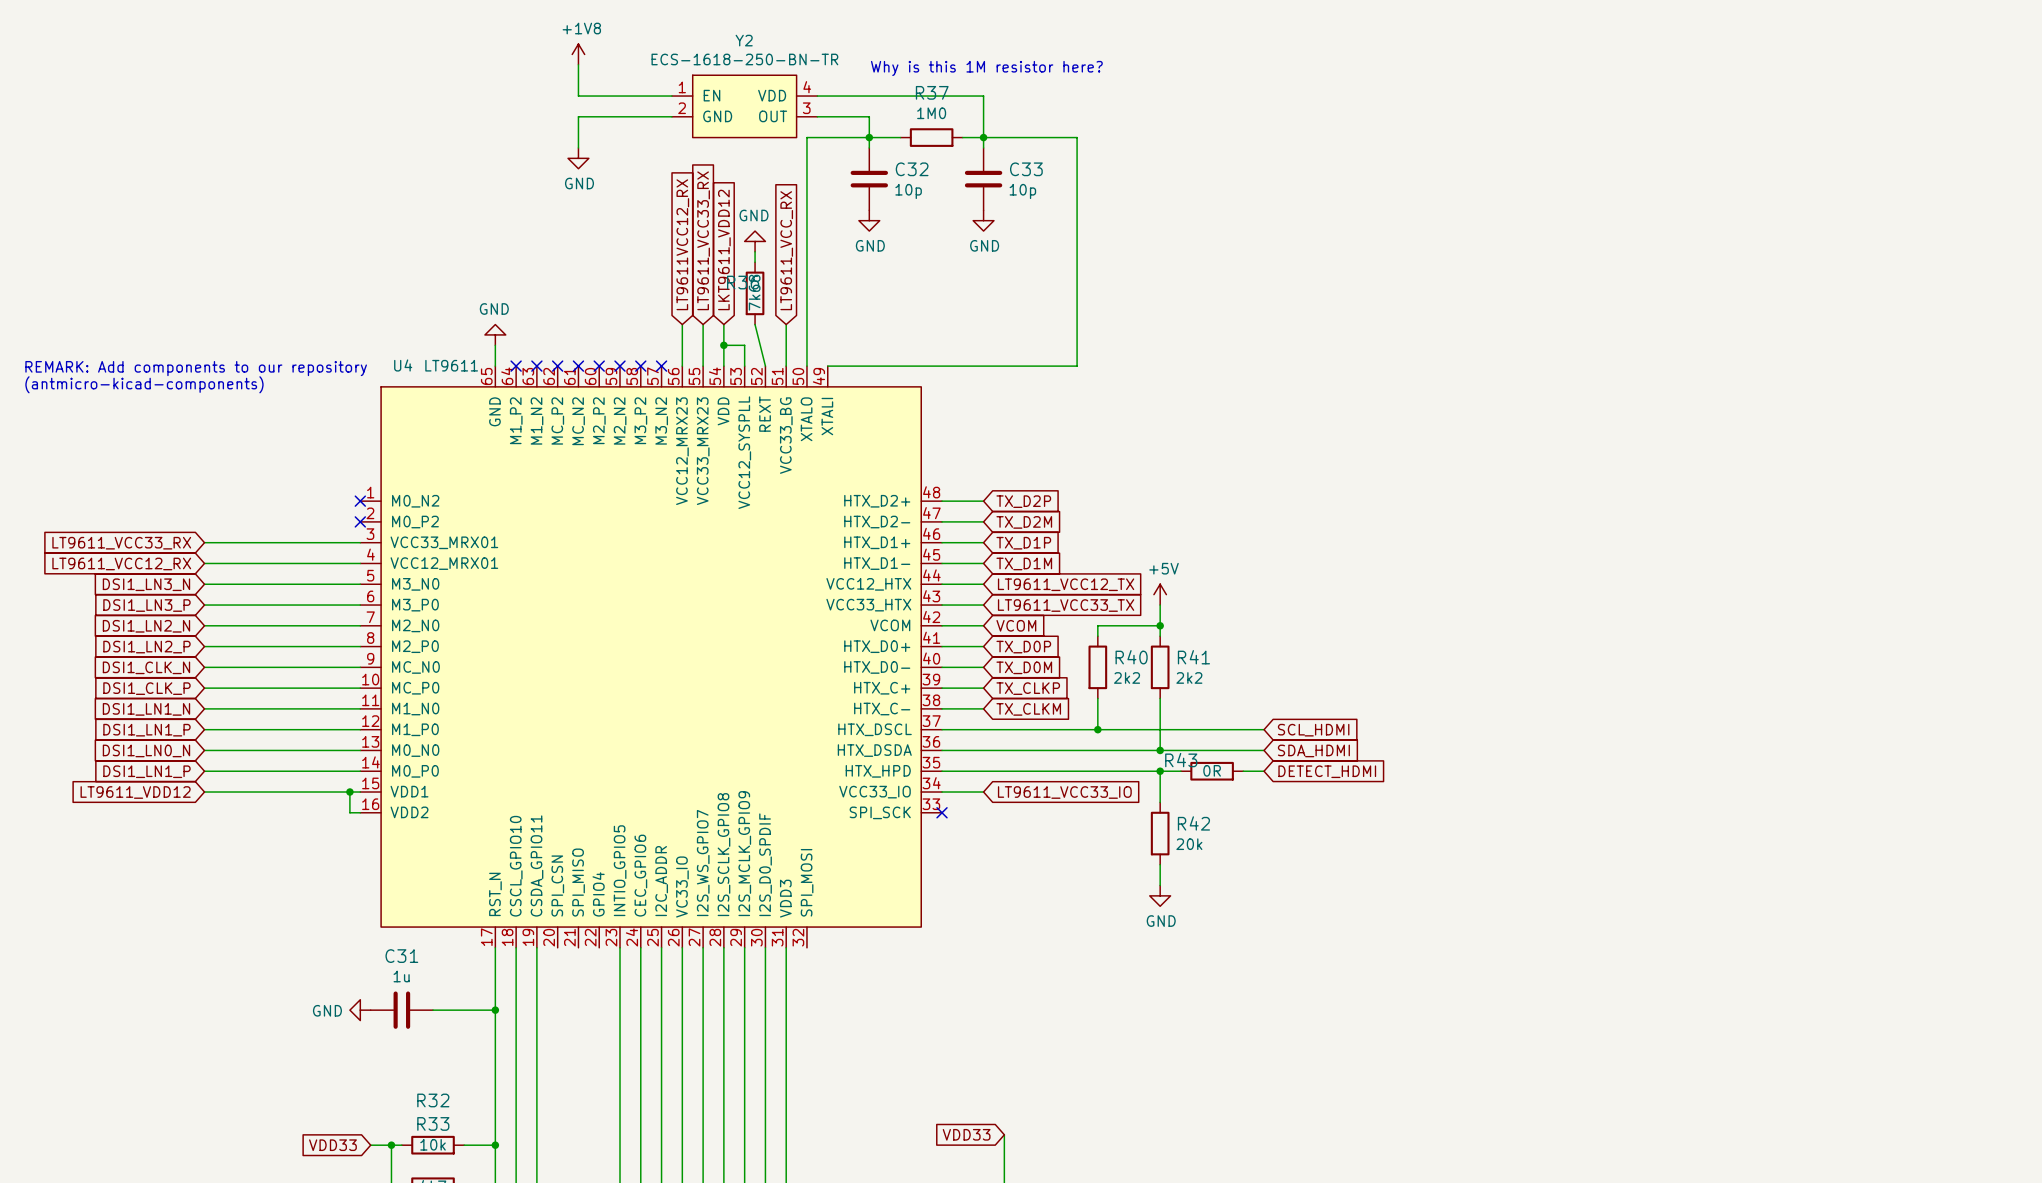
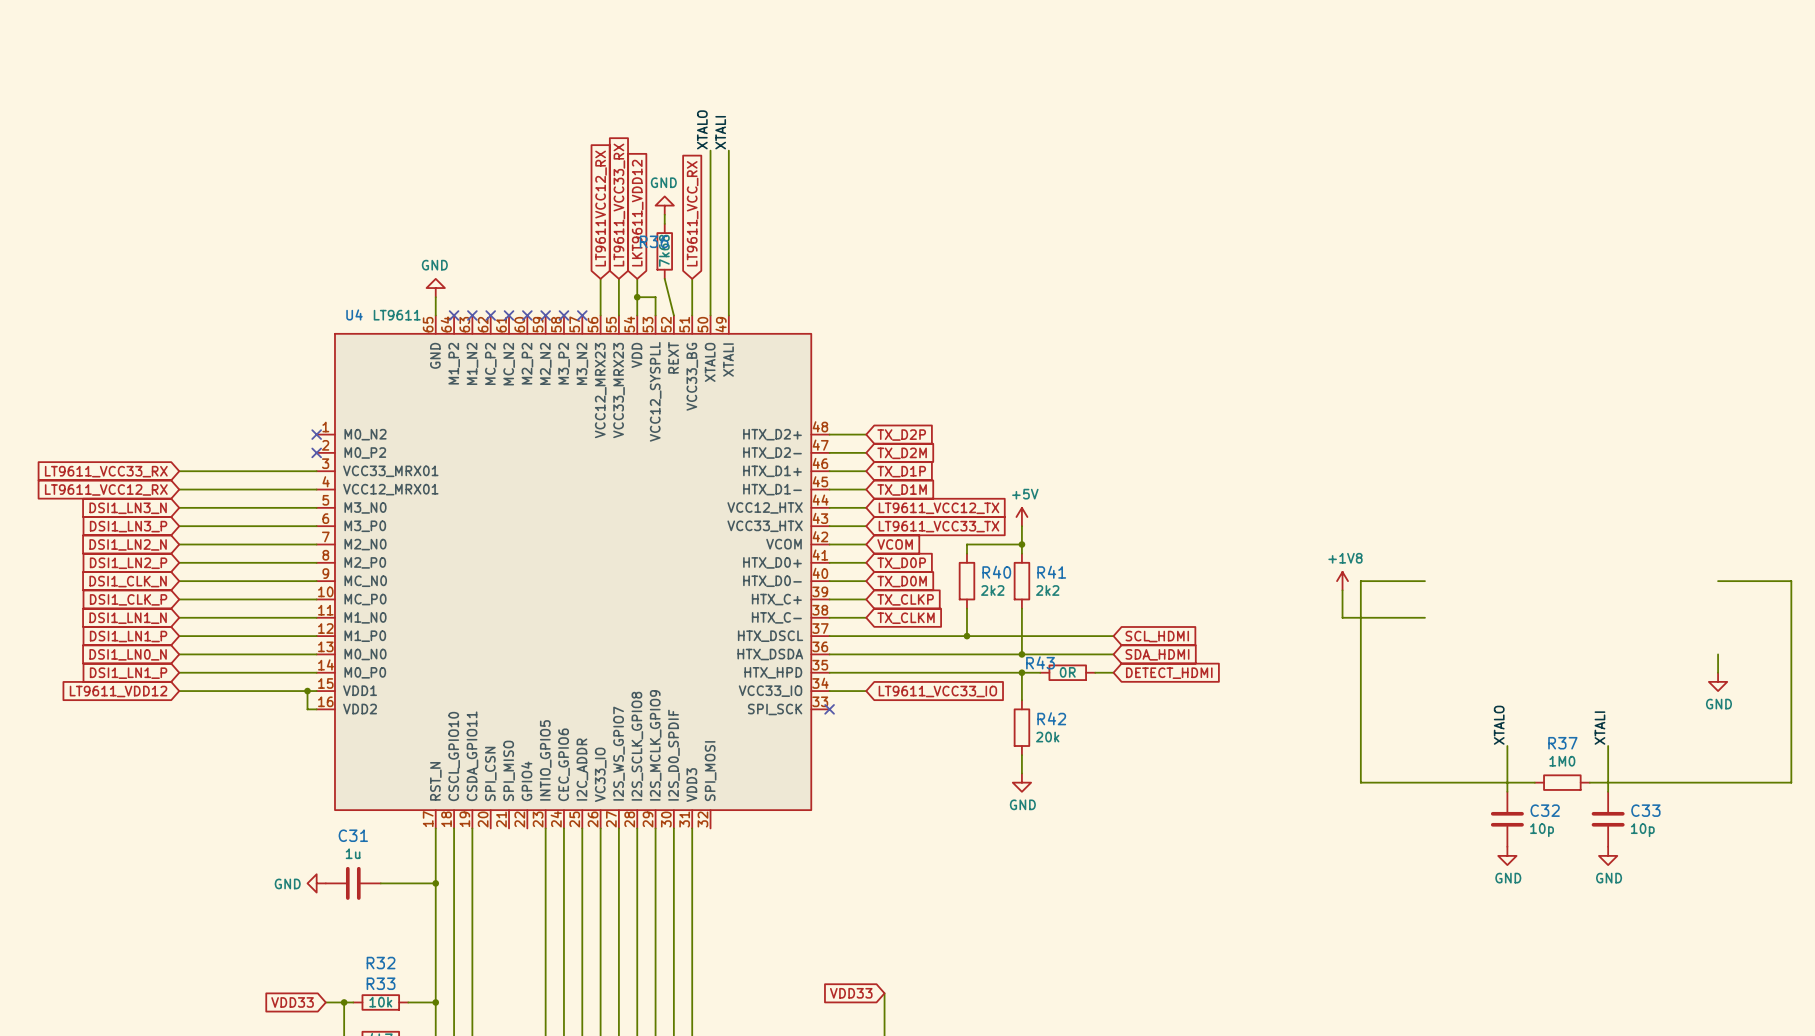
power symbol: +1V8 (578, 54) -> none
wire: (578, 64) (578, 96) (671, 96) -> none
text: Why is this 1M resistor here? (986, 68) -> none
wire: (817, 96) (983, 96) (983, 147) -> none
Y2: ECS-1618-250-BN-TR (744, 106) -> none
wire: (671, 116) (578, 116) (578, 147) -> none
wire: (817, 116) (869, 116) (869, 147) -> none
junction: (869, 137) -> none
wire: (900, 137) (806, 137) (806, 179) -> none
R37 position: (931, 137) -> (1562, 782)
wire: (962, 137) (1077, 137) (1077, 366) (827, 366) -> (728, 150) (728, 315)
junction: (983, 137) -> none
label: none -> XTALO (702, 129)
power symbol: GND (578, 158) -> none
label: none -> XTALI (720, 132)
C32 position: (869, 179) -> (1507, 819)
C33 position: (983, 179) -> (1608, 819)
power symbol: GND (869, 220) -> none
power symbol: GND (983, 220) -> none
text: REMARK: Add components to our repository (196, 368) -> none
text: (antmicro-kicad-components) (144, 384) -> none
power symbol: none -> +1V8 (1342, 581)
wire: none -> (1424, 581) (1360, 581) (1360, 782) (1534, 782)
wire: none -> (1718, 581) (1791, 581) (1791, 782) (1589, 782)
wire: none -> (1342, 590) (1342, 617) (1424, 617)
wire: none -> (1718, 654) (1718, 672)
power symbol: none -> GND (1718, 681)
label: none -> XTALO (1499, 725)
label: none -> XTALI (1599, 728)
wire: none -> (1507, 746) (1507, 791)
wire: none -> (1608, 746) (1608, 791)
power symbol: none -> GND (1507, 855)
power symbol: none -> GND (1608, 855)

